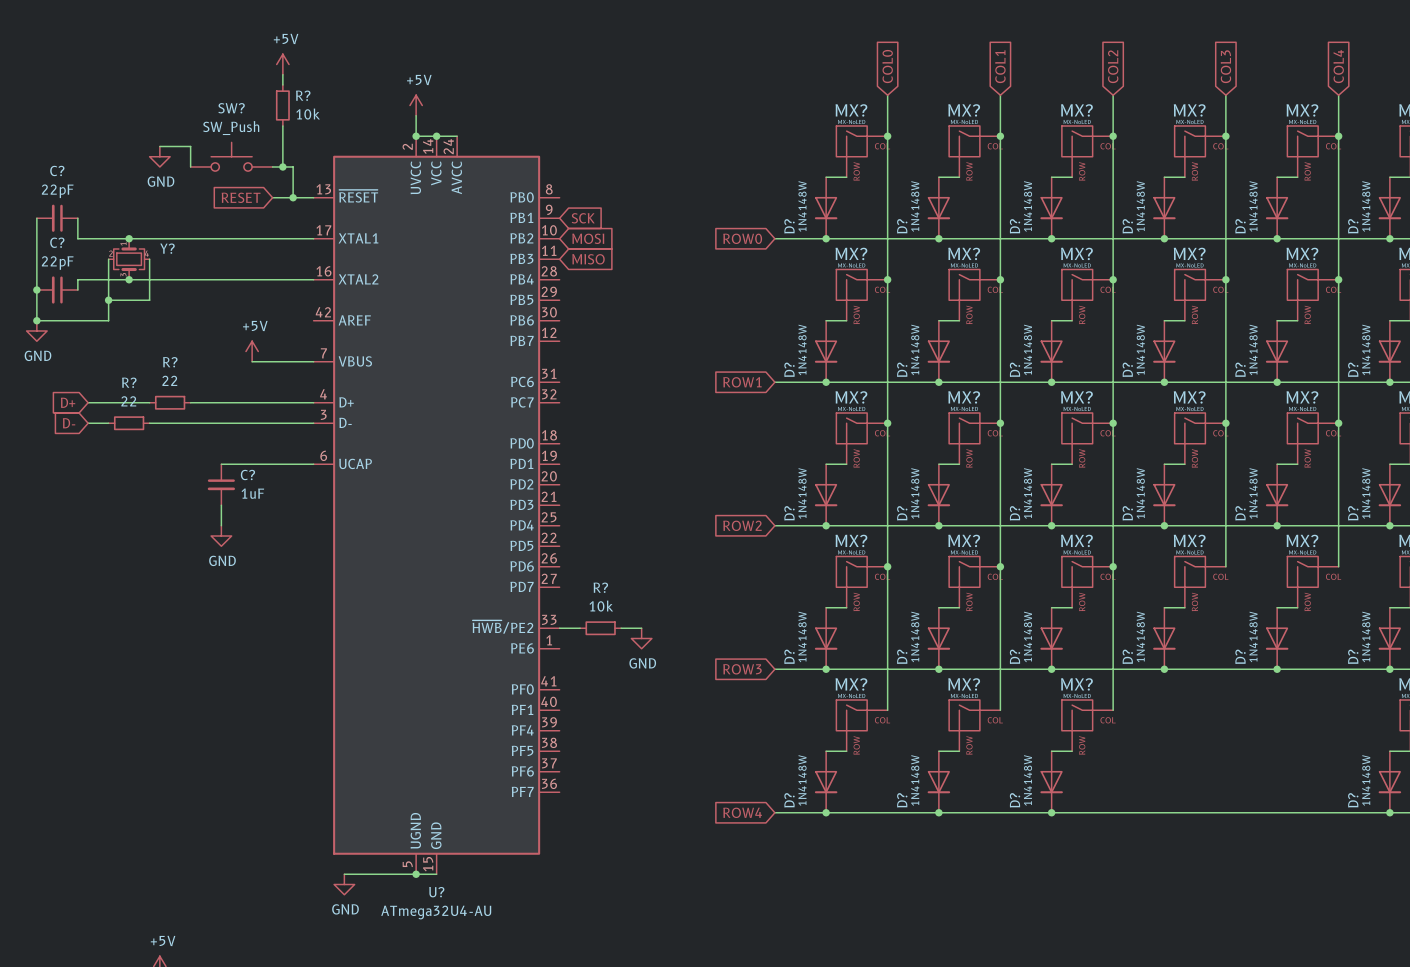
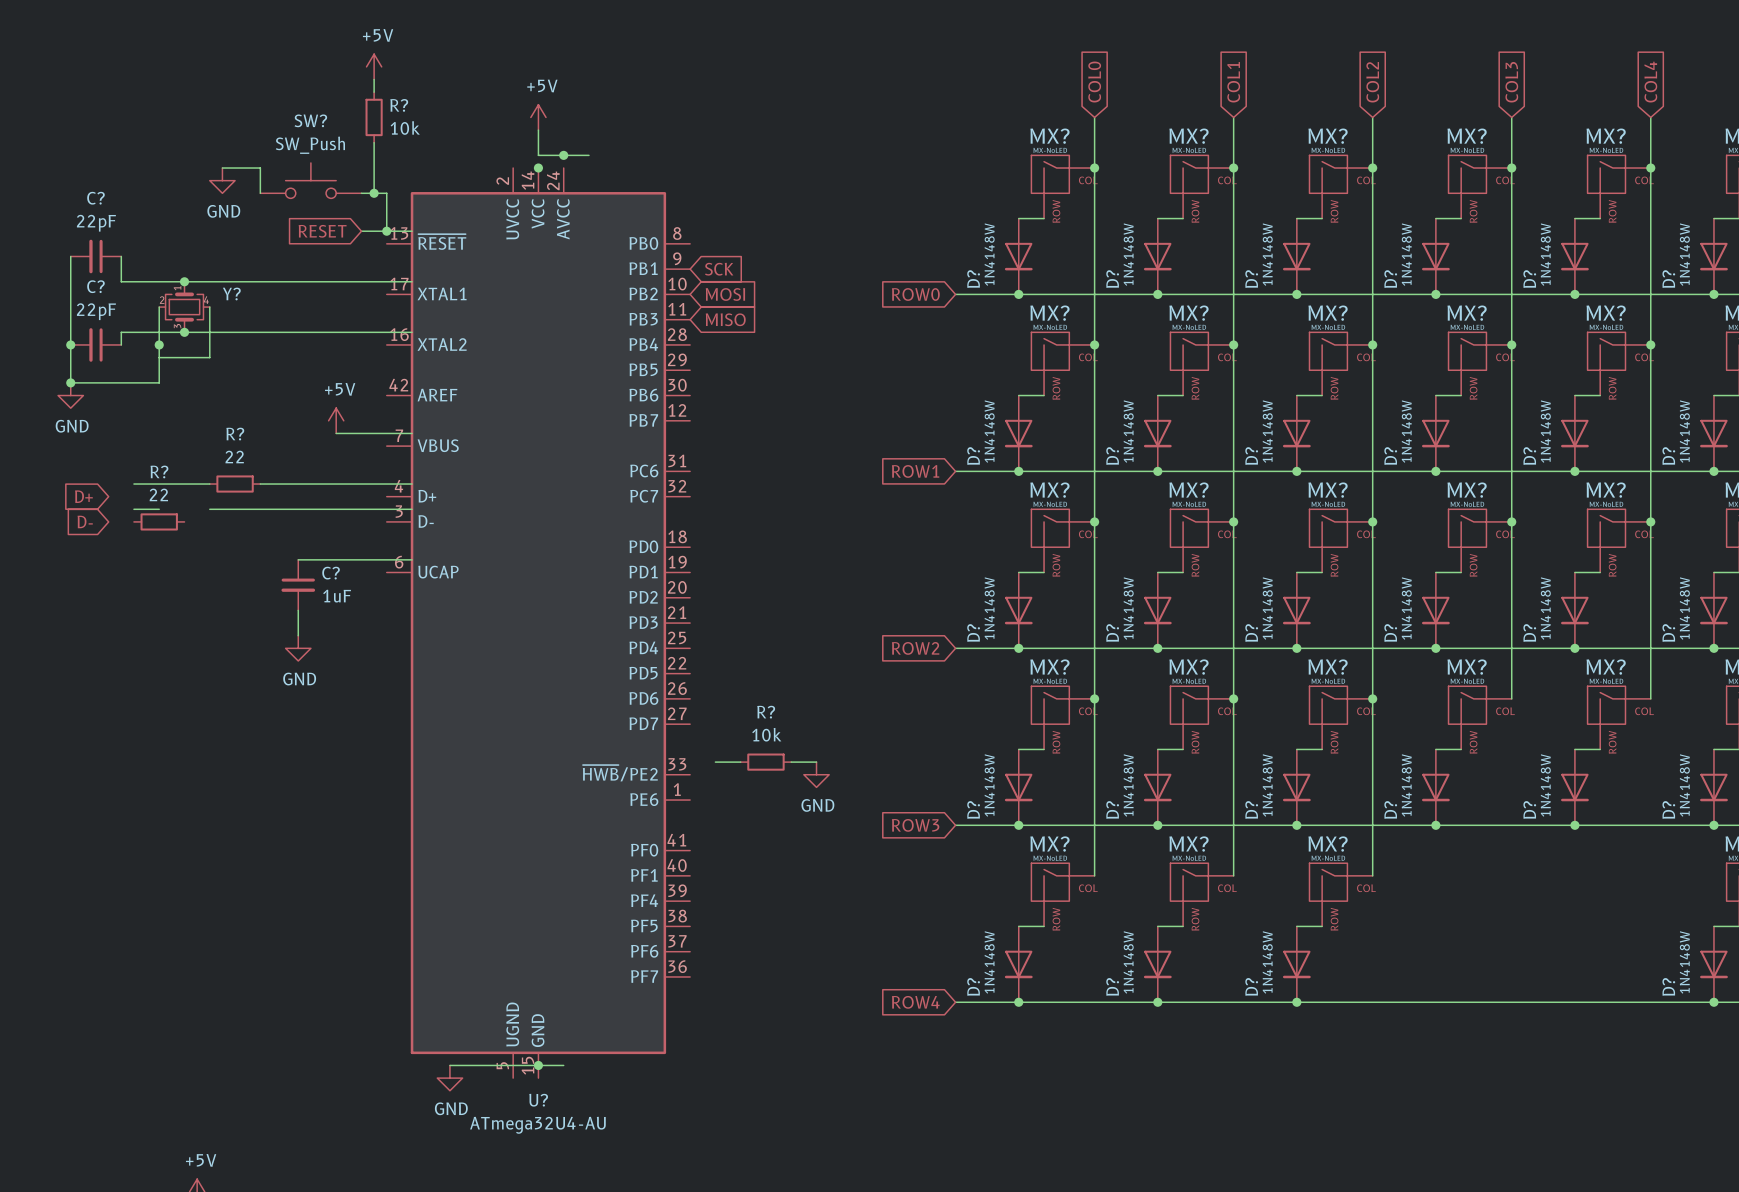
power symbol position: +5V (282, 64) -> +5V (374, 66)
wire: (282, 74) (282, 84) -> (374, 79) (374, 92)
R? position: (282, 105) -> (374, 117)
power symbol position: +5V (416, 105) -> +5V (538, 117)
wire: (416, 115) (416, 136) (457, 136) -> (538, 130) (538, 155) (588, 155)
wire: (282, 125) (282, 166) -> (374, 142) (374, 193)
junction position: (416, 136) -> (563, 155)
wire: (159, 146) (190, 146) (190, 166) -> (222, 168) (260, 168) (260, 193)
power symbol position: GND (159, 156) -> GND (222, 180)
SW? position: (231, 156) -> (310, 180)
junction: none -> (374, 193)
wire: (272, 166) (293, 166) (293, 197) -> (361, 193) (386, 193) (386, 231)
junction: (282, 166) -> none
junction: none -> (386, 231)
global label position: RESET (241, 197) -> RESET (322, 231)
wire: (272, 197) (313, 197) -> (361, 231) (412, 231)
junction: (293, 197) -> none
wire: (36, 218) (36, 320) (108, 320) (108, 259) -> (70, 256) (70, 382) (159, 382) (159, 307)
C? position: (57, 218) -> (96, 256)
wire: (77, 218) (77, 238) (313, 238) -> (121, 256) (121, 281) (412, 281)
junction: none -> (184, 281)
junction: (129, 238) -> none
Y? position: (129, 259) -> (184, 307)
wire: (149, 259) (149, 300) (108, 300) -> (209, 307) (209, 357) (159, 357)
junction: none -> (184, 332)
junction: none -> (70, 344)
wire: (313, 279) (77, 279) (77, 289) -> (412, 332) (121, 332) (121, 344)
junction: (36, 289) -> none
C? position: (57, 289) -> (96, 344)
junction: (108, 300) -> none
junction: none -> (70, 382)
junction: (36, 320) -> none
power symbol position: GND (36, 330) -> GND (70, 395)
power symbol position: +5V (252, 351) -> +5V (336, 420)
wire: (252, 361) (313, 361) -> (336, 433) (412, 433)
wire: (88, 402) (149, 402) -> (133, 484) (209, 484)
R? position: (170, 402) -> (235, 484)
wire: (190, 402) (313, 402) -> (260, 484) (412, 484)
wire: (88, 423) (108, 423) -> (133, 509) (159, 509)
wire: (149, 423) (313, 423) -> (209, 509) (412, 509)
wire: (221, 464) (313, 464) -> (298, 559) (412, 559)
C? position: (221, 484) -> (298, 585)
wire: (221, 505) (221, 525) -> (298, 610) (298, 635)
power symbol position: GND (221, 536) -> GND (298, 648)
wire: (559, 628) (580, 628) -> (715, 762) (740, 762)
R? position: (600, 628) -> (765, 762)
wire: (621, 628) (641, 628) -> (791, 762) (816, 762)
power symbol position: GND (641, 638) -> GND (816, 774)
wire: (344, 874) (436, 874) -> (449, 1065) (563, 1065)
junction position: (416, 874) -> (538, 1065)
power symbol position: GND (344, 884) -> GND (449, 1078)

